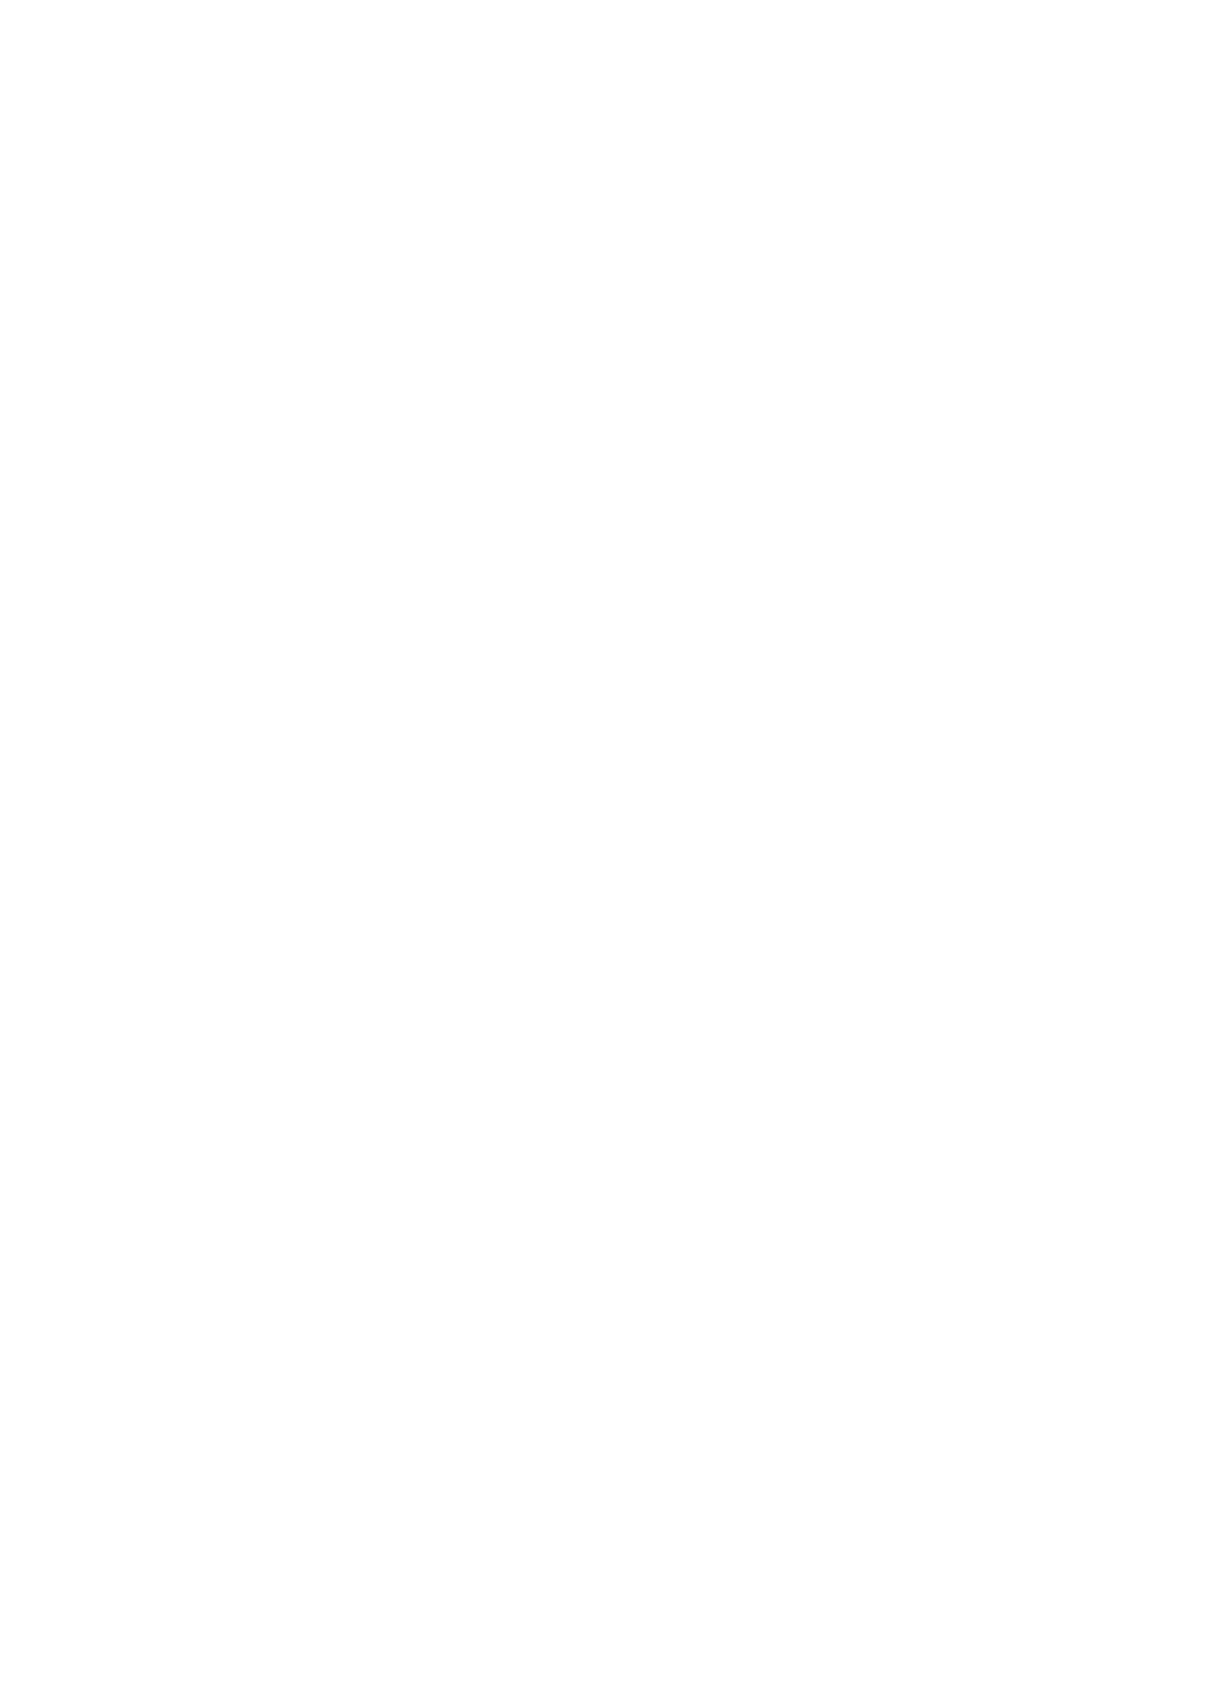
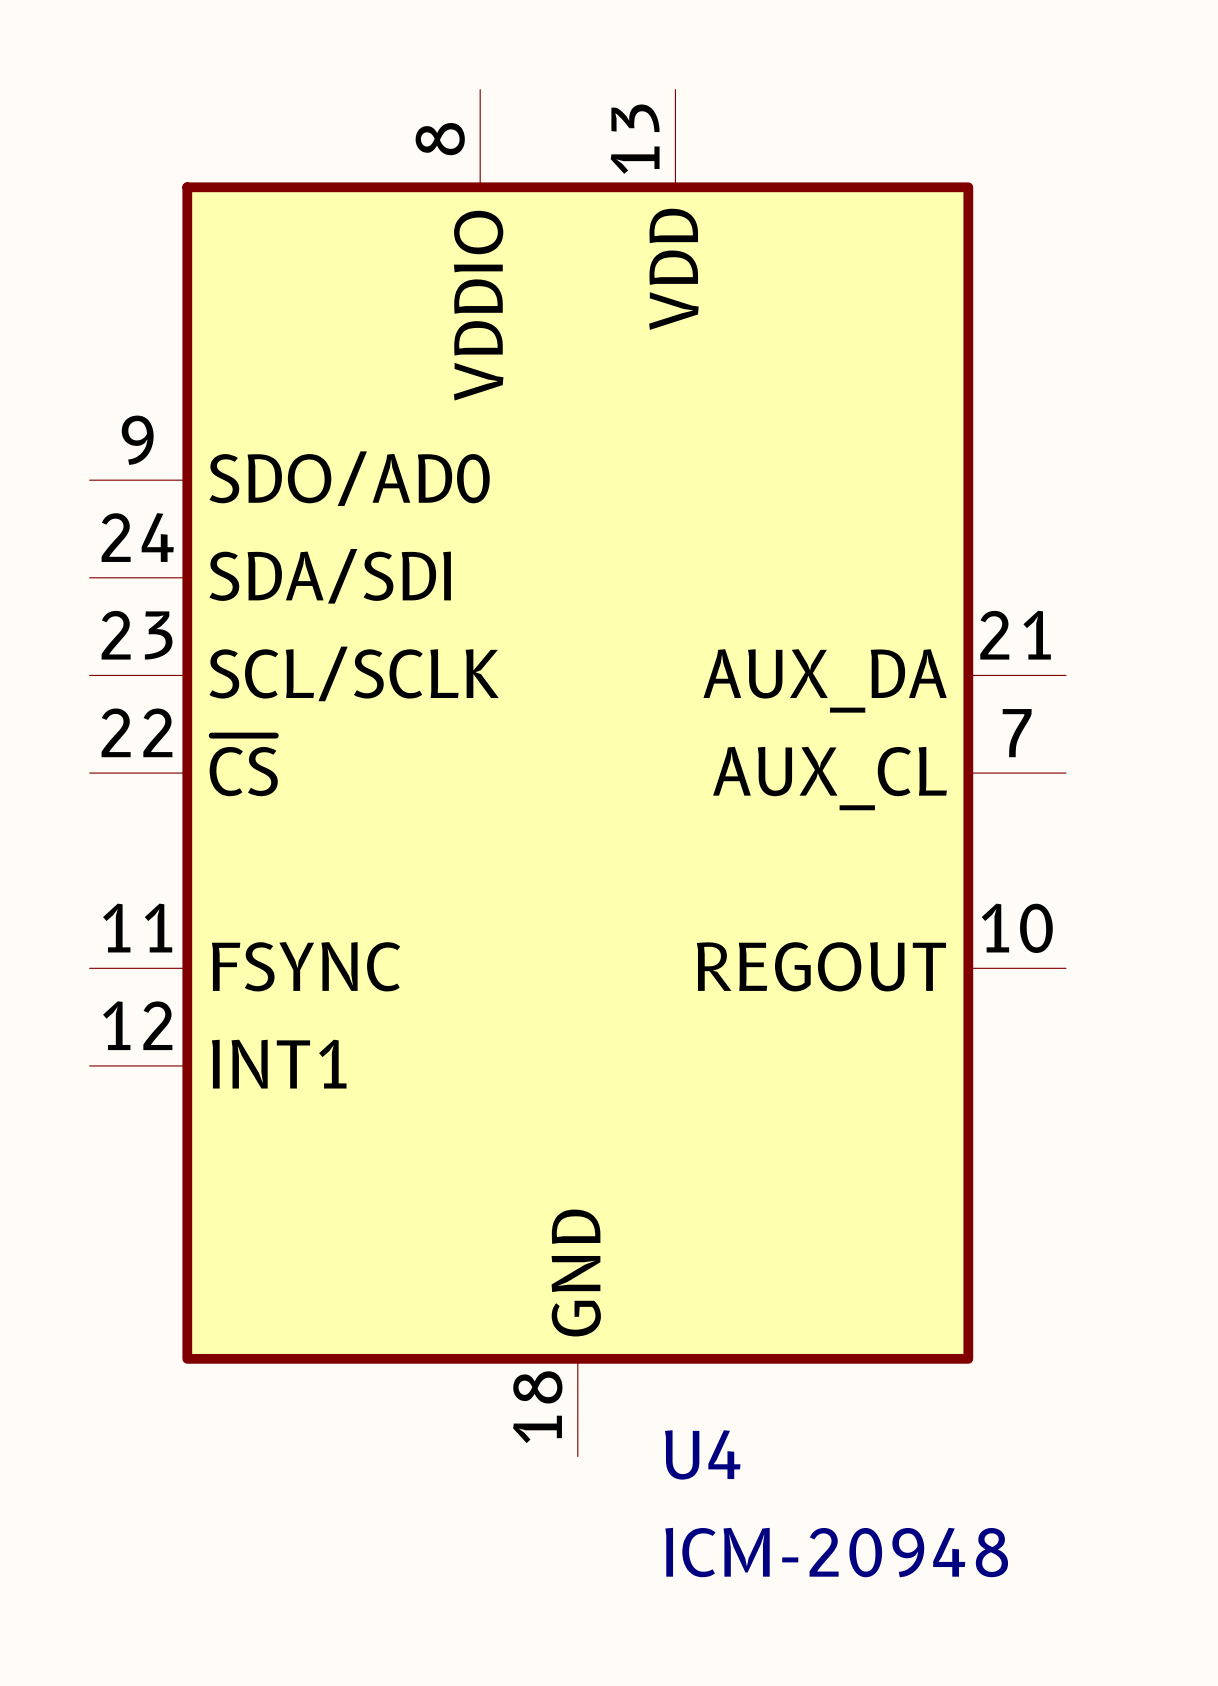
U4: none -> ICM-20948 (577, 773)

